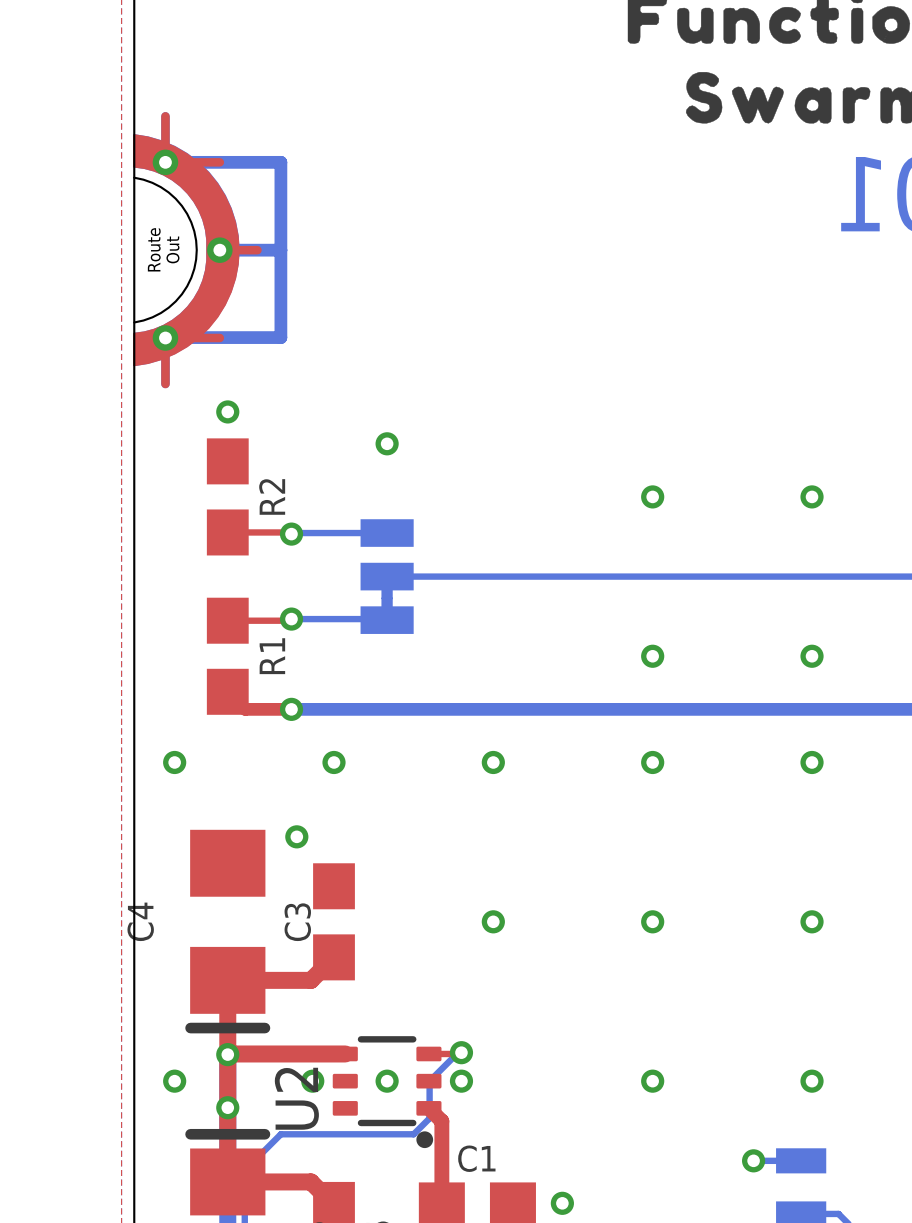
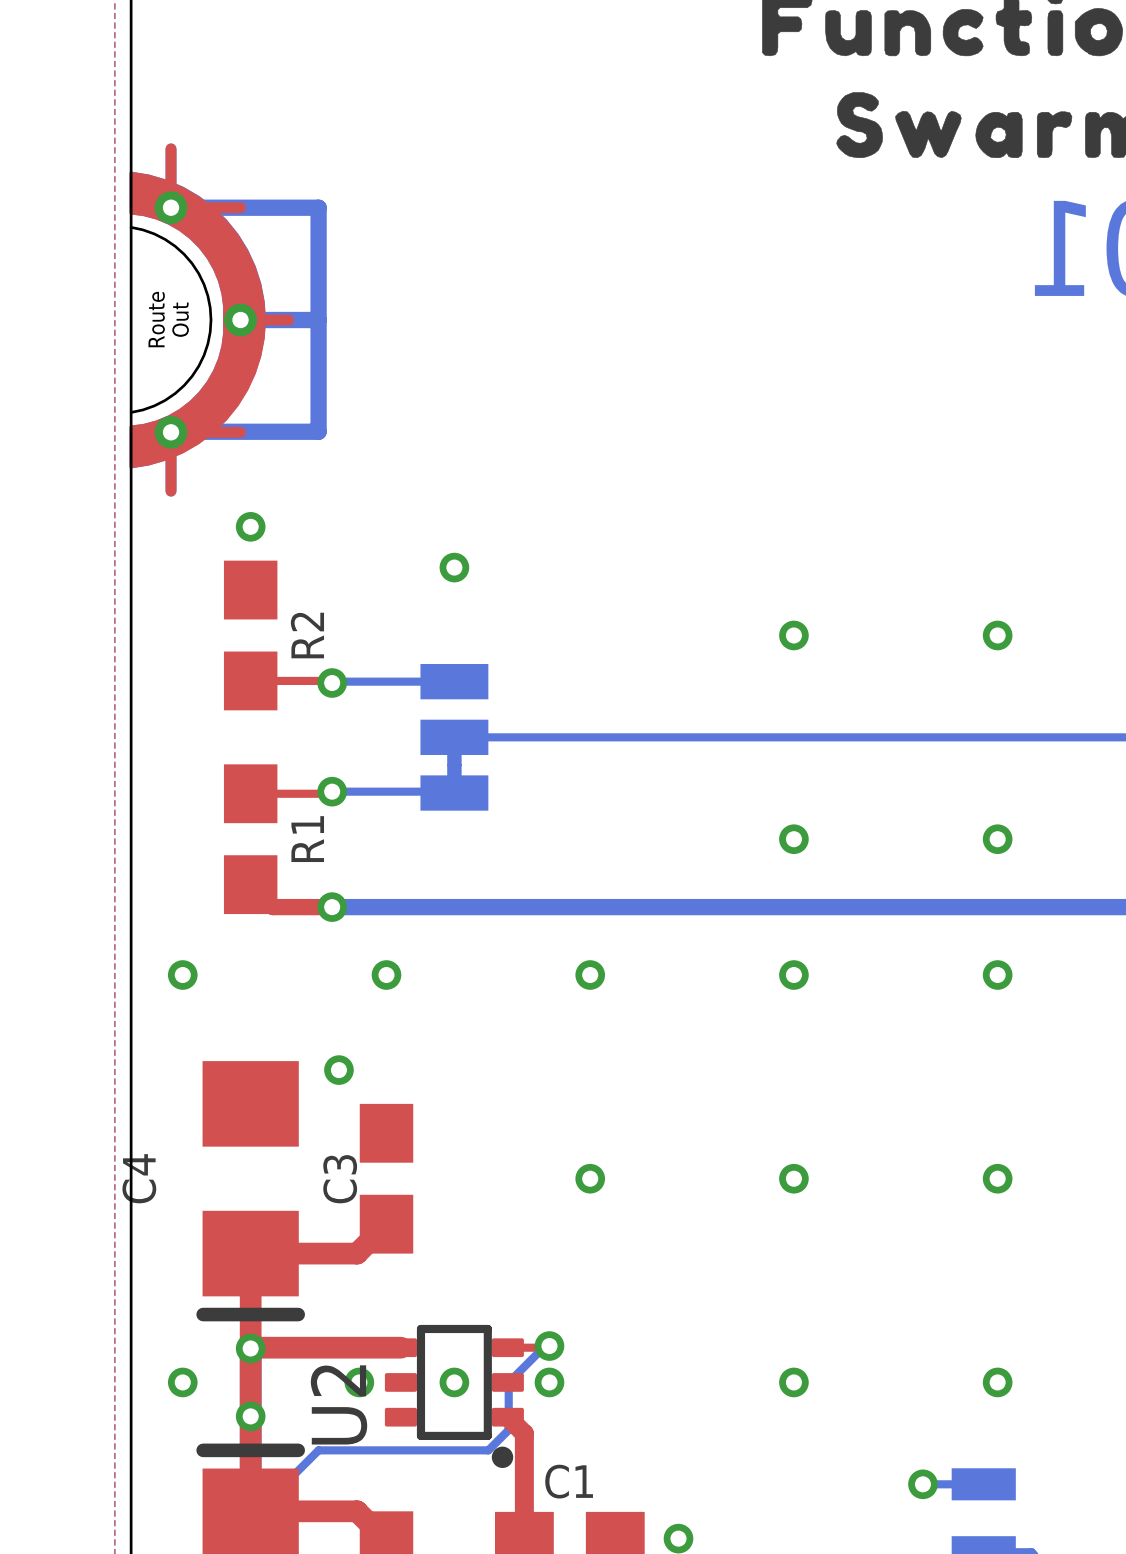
U2 footprint: [332, 1036, 442, 1149] -> [384, 1324, 524, 1469]

